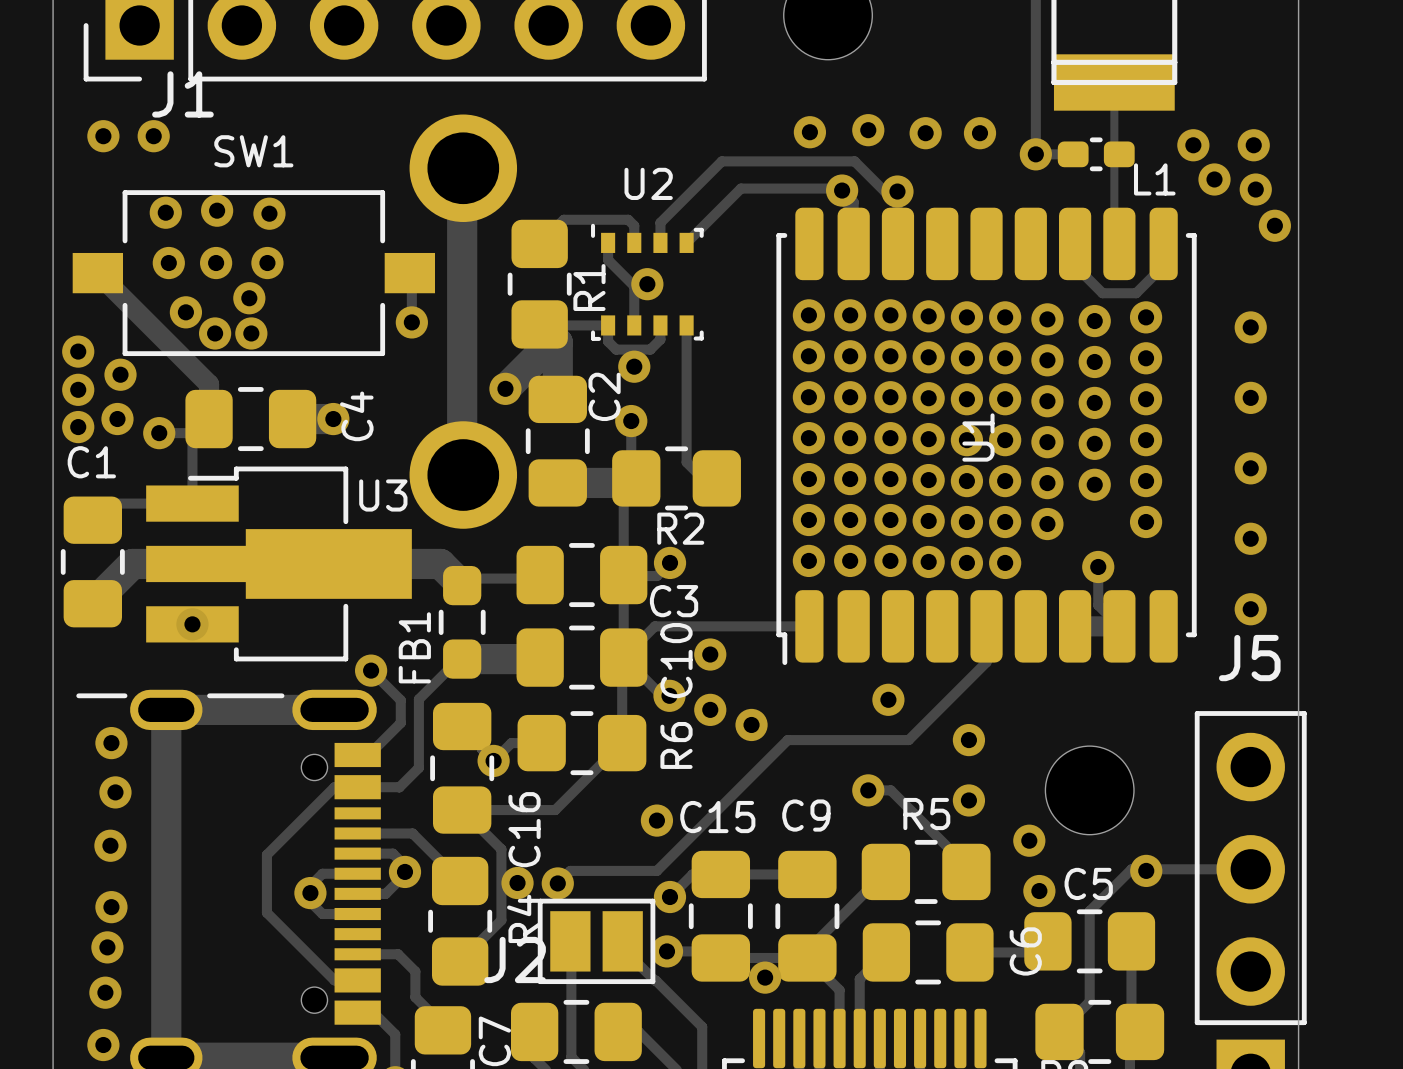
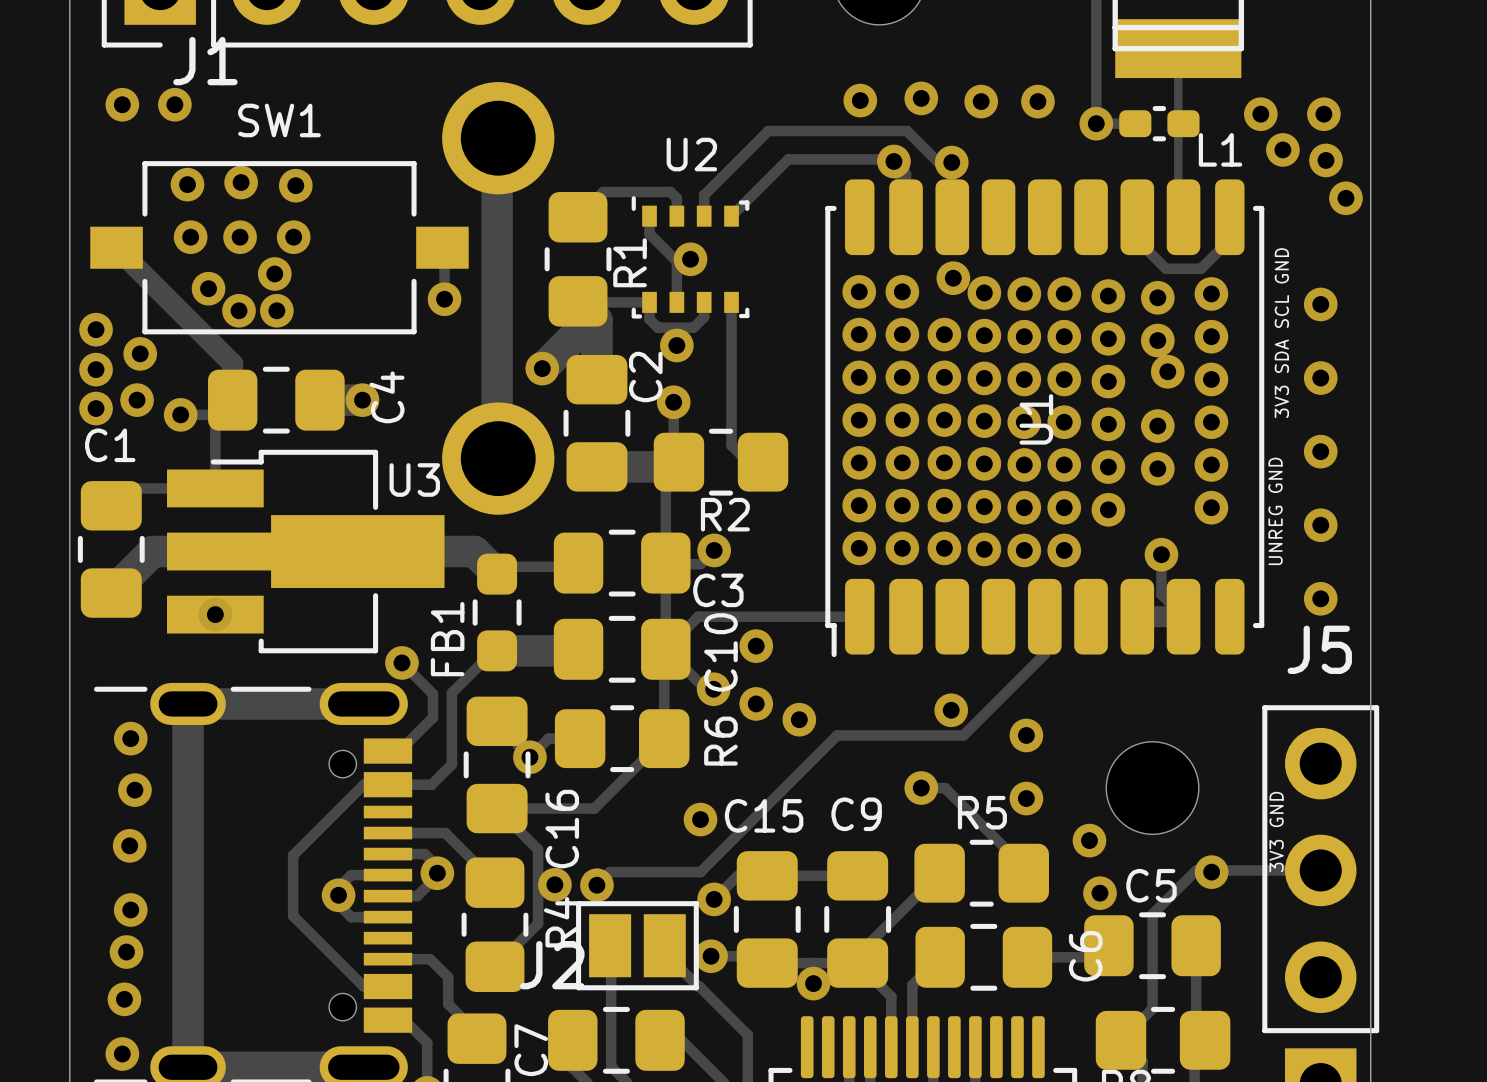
via position: (890, 315) -> (953, 278)
text: none -> 3V3 SDA SCL GND (1281, 333)
via position: (1094, 402) -> (1167, 371)
text: none -> UNREG GND (1275, 511)
via position: (888, 699) -> (951, 710)
text: none -> 3V3 GND (1276, 832)

